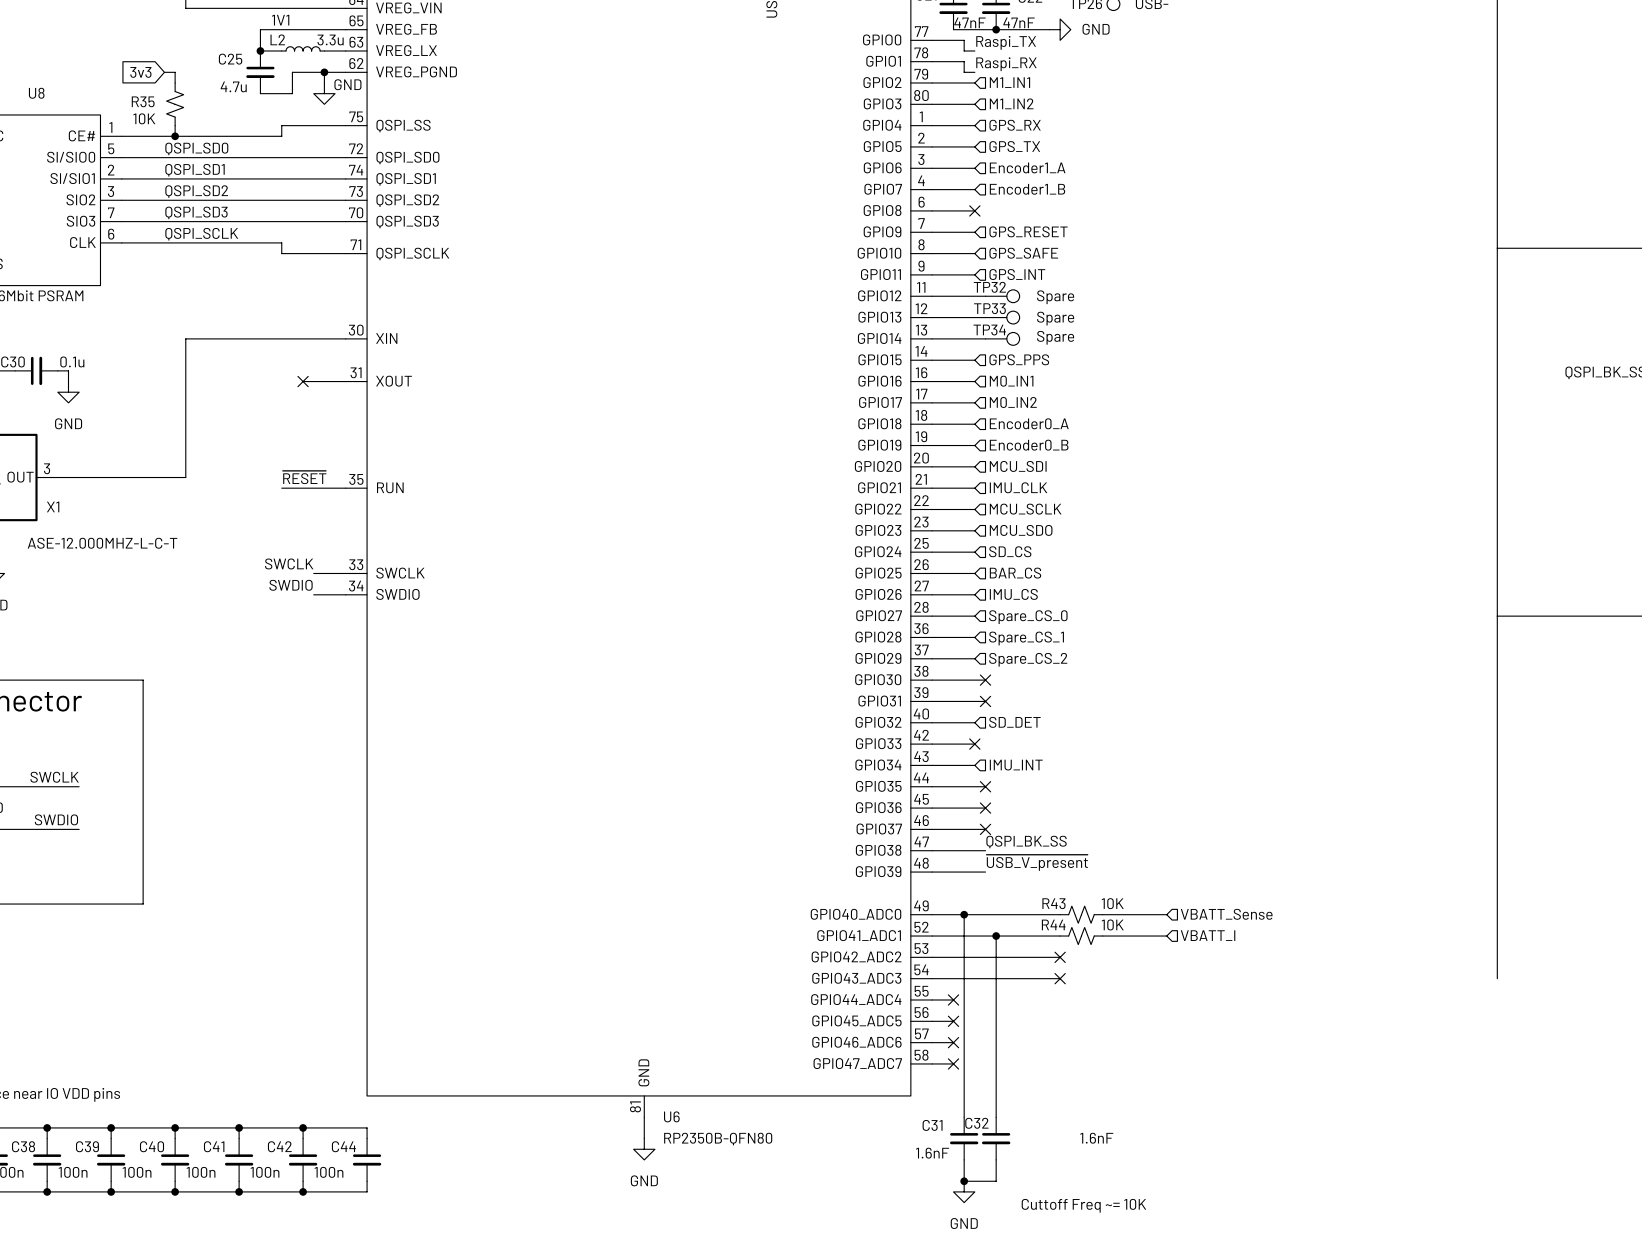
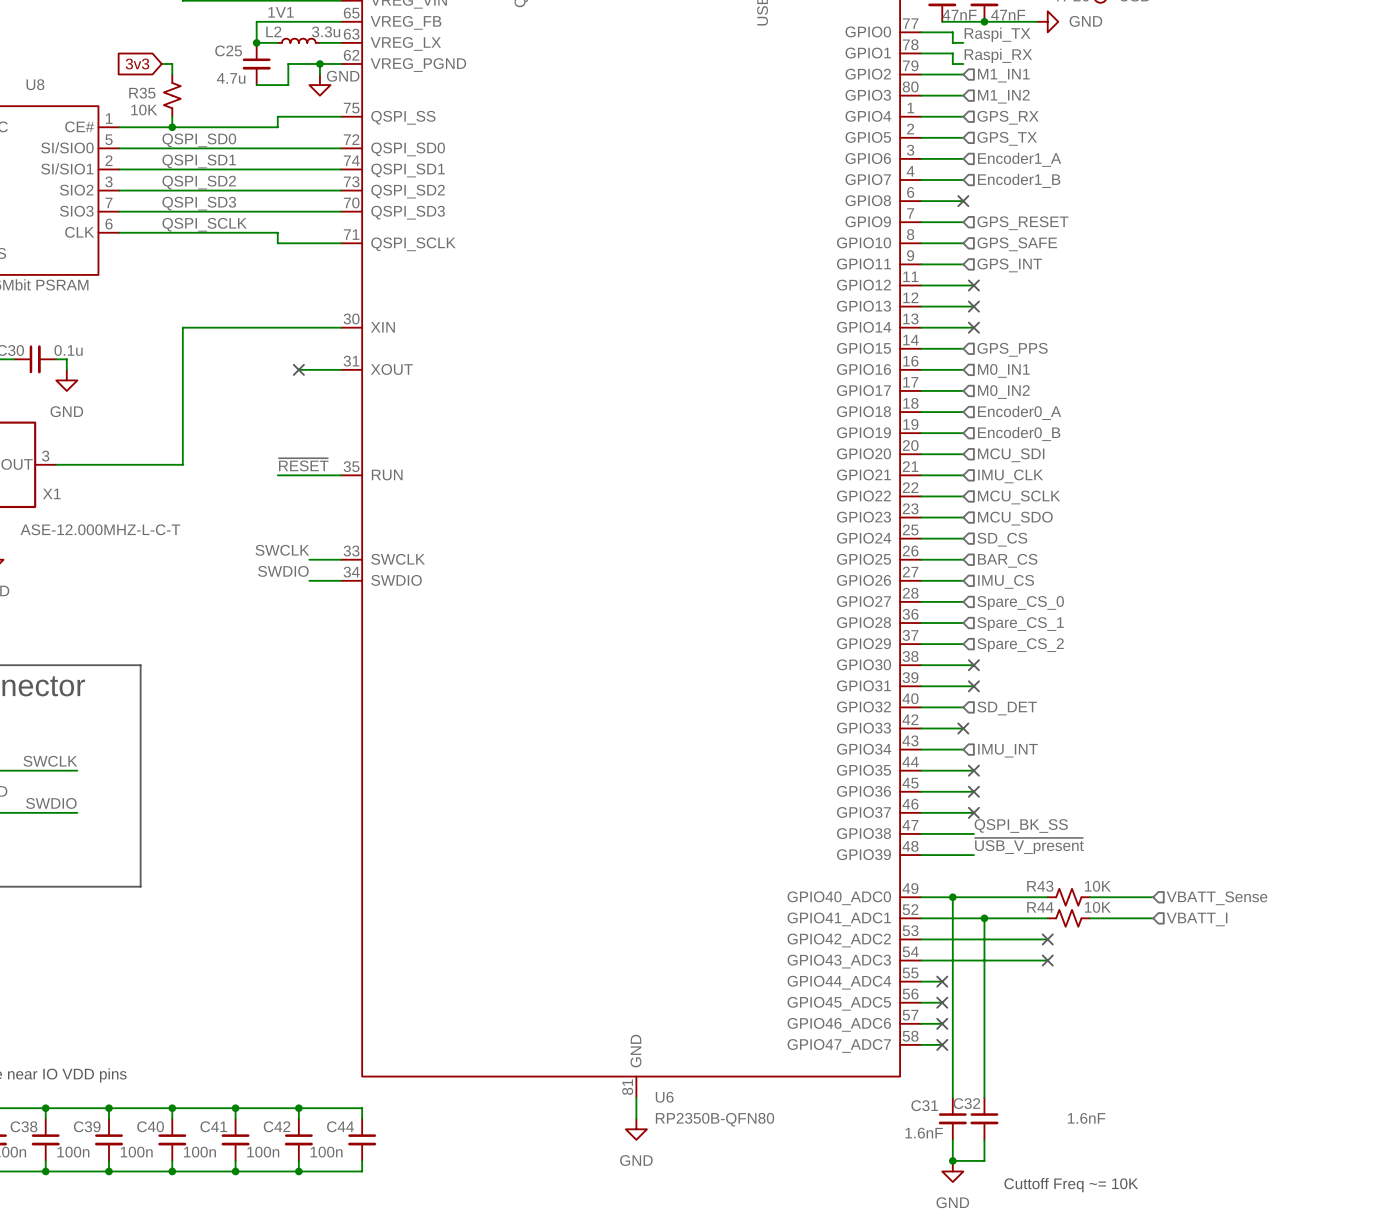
no-connect mark: none -> (973, 285)
TP32: Spare (1002, 296) -> none
no-connect mark: none -> (973, 306)
TP33: Spare (1002, 317) -> none
no-connect mark: none -> (973, 327)
TP34: Spare (1002, 338) -> none

